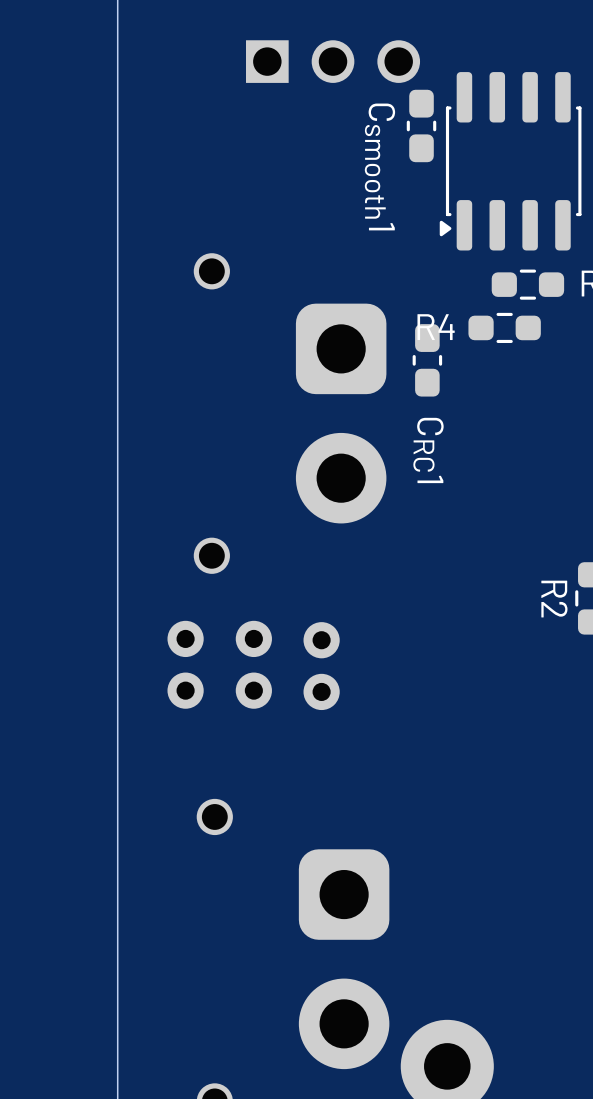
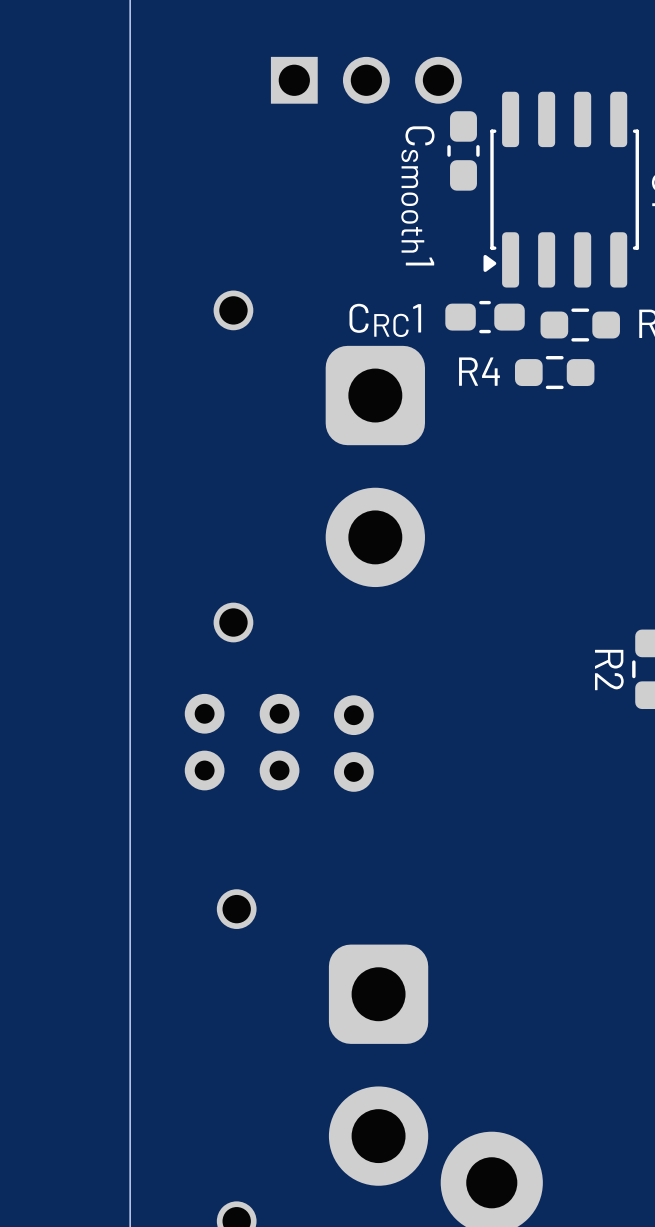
CRC1 rotation: 0° (427, 360) -> 90° clockwise (485, 317)
CRC1 position: (427, 360) -> (485, 317)

